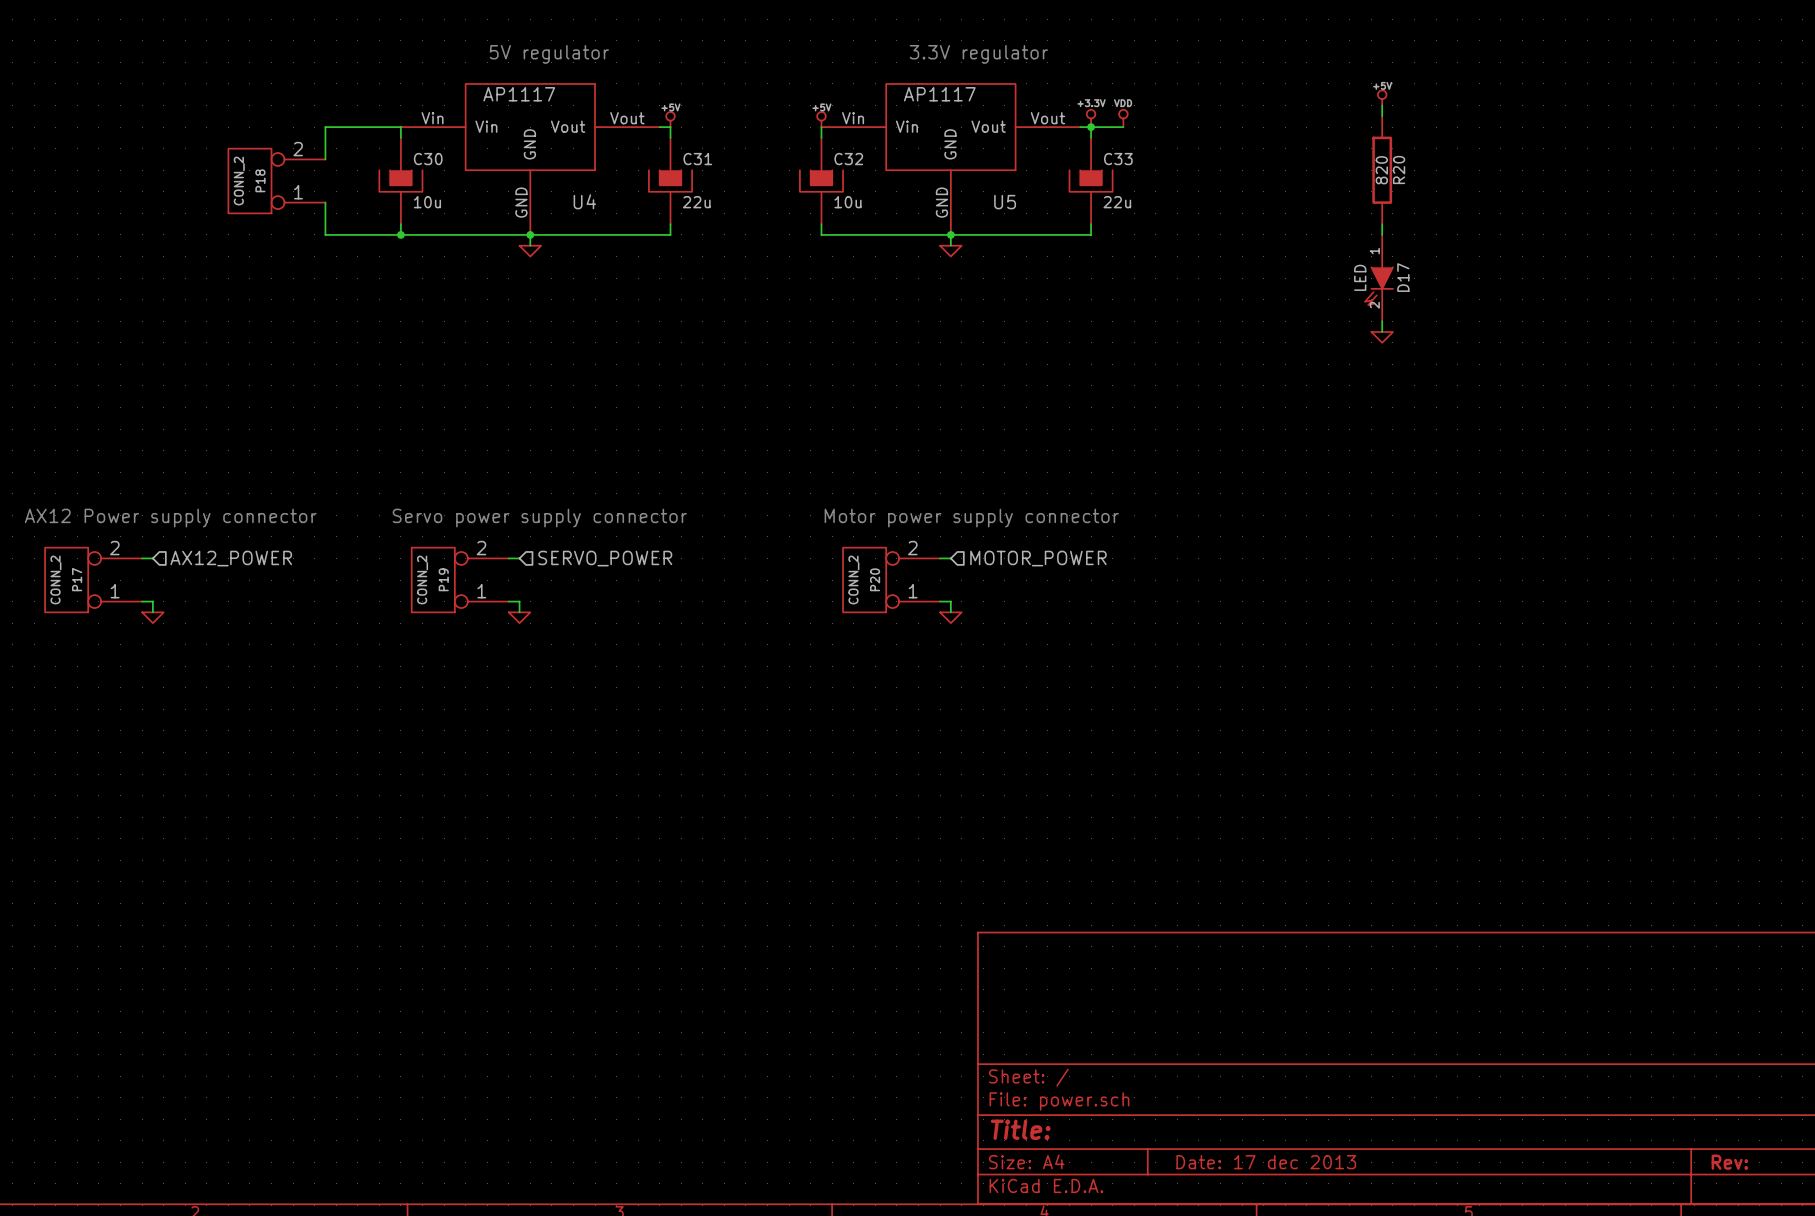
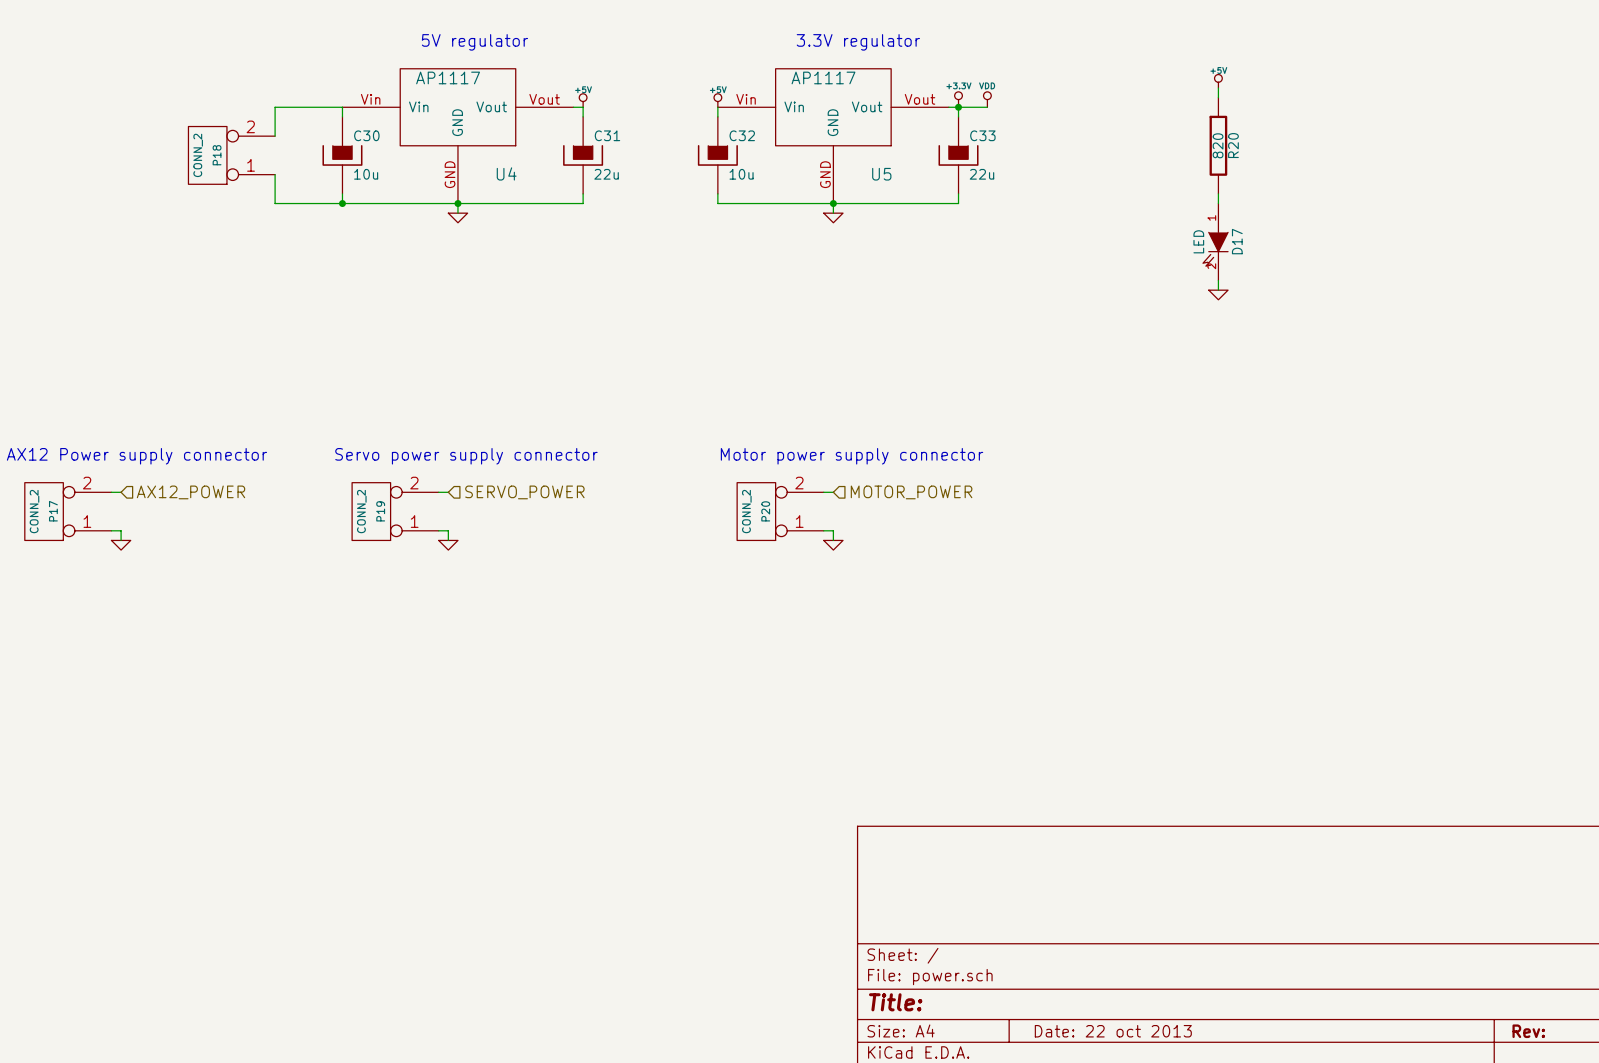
title block: Date: 17 dec 2013 (1266, 1162) -> Date: 22 oct 2013 (1113, 1031)

